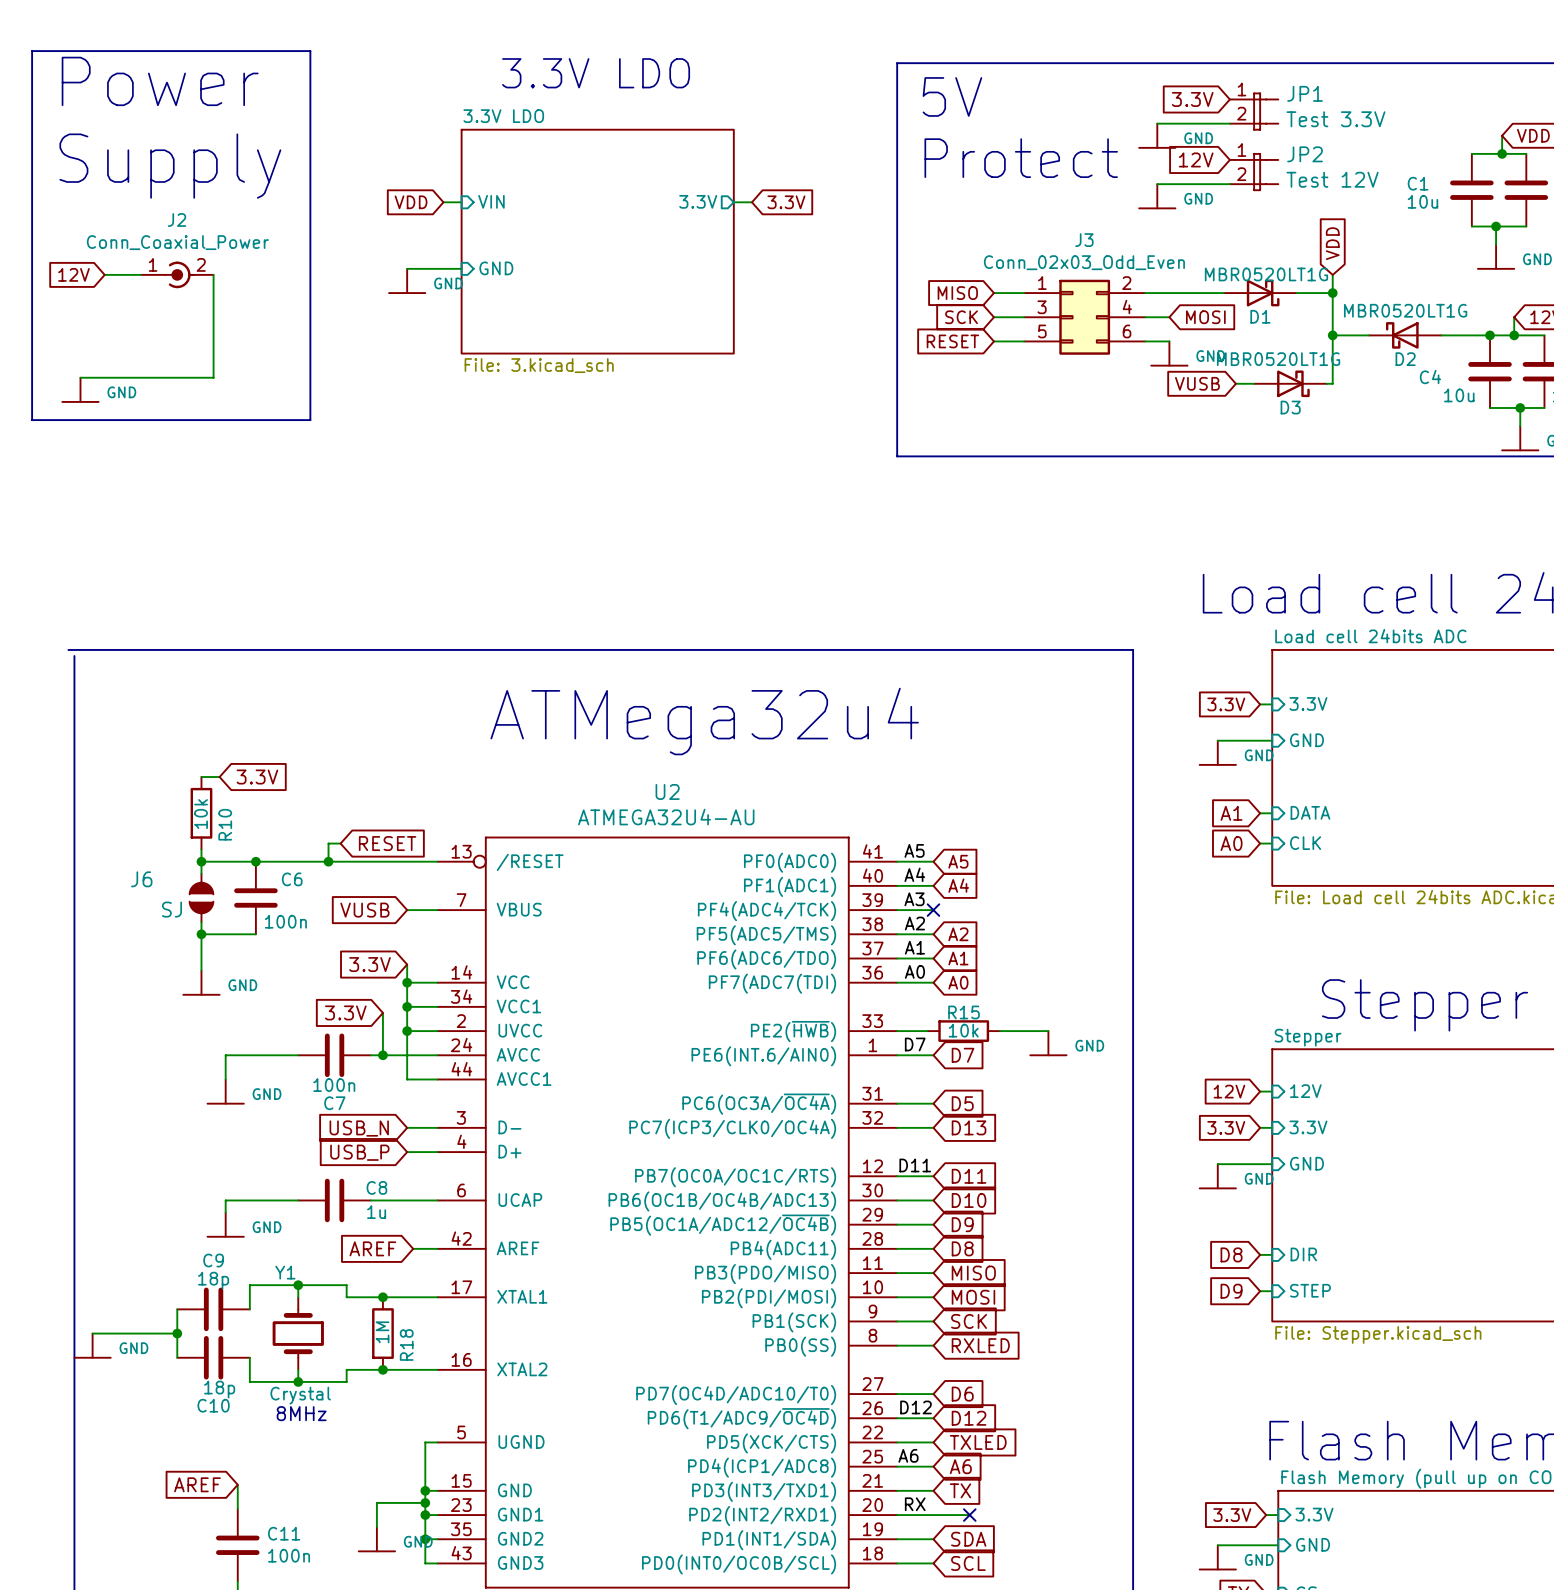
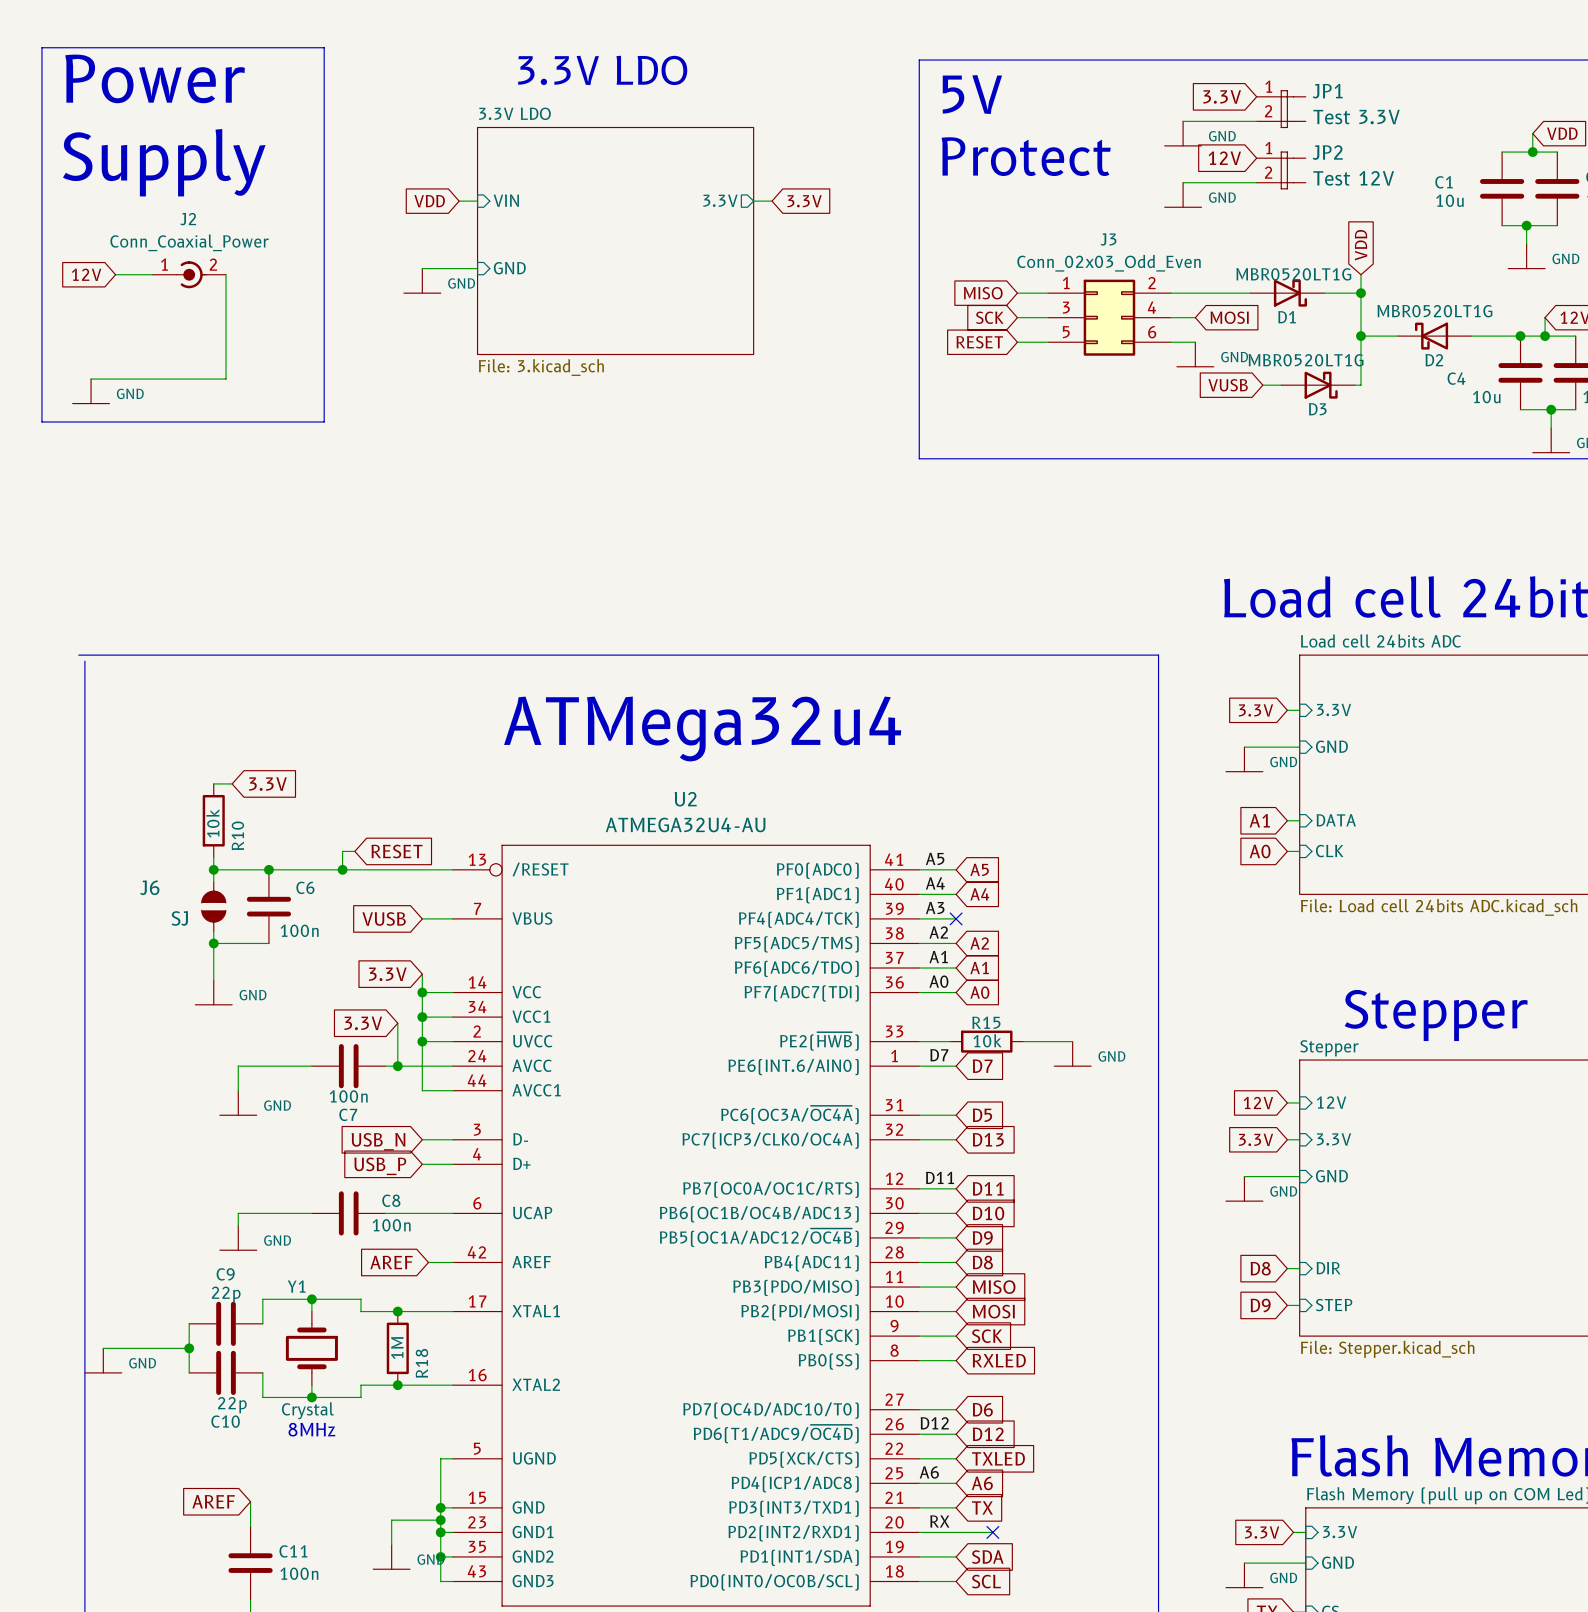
C8 value: 1u (376, 1212) -> 100n (391, 1225)
C9 value: 18p (213, 1280) -> 22p (226, 1294)
C10 value: 18p (219, 1389) -> 22p (232, 1405)

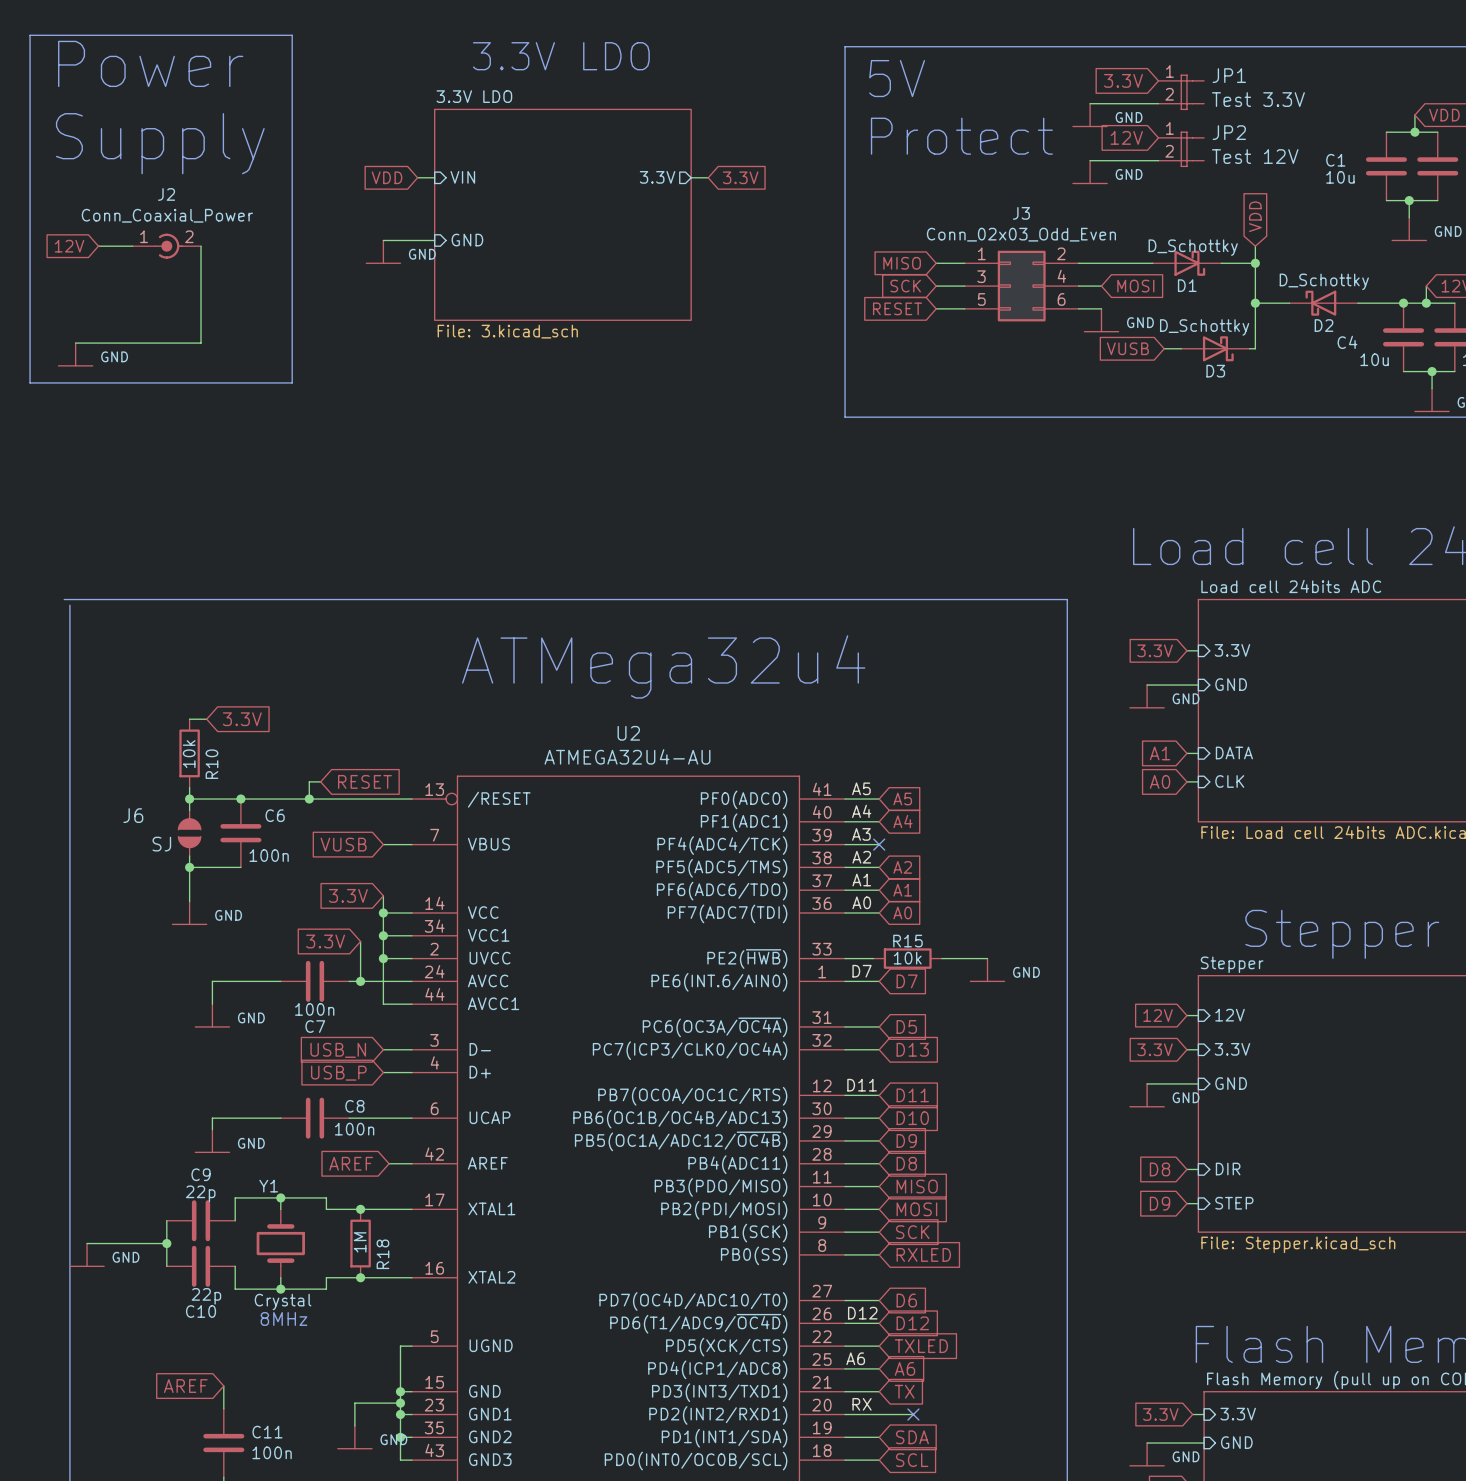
D1 value: MBR0520LT1G (1293, 274) -> D_Schottky (1193, 247)
D2 value: MBR0520LT1G (1434, 311) -> D_Schottky (1324, 281)
D3 value: MBR0520LT1G (1306, 360) -> D_Schottky (1204, 327)

